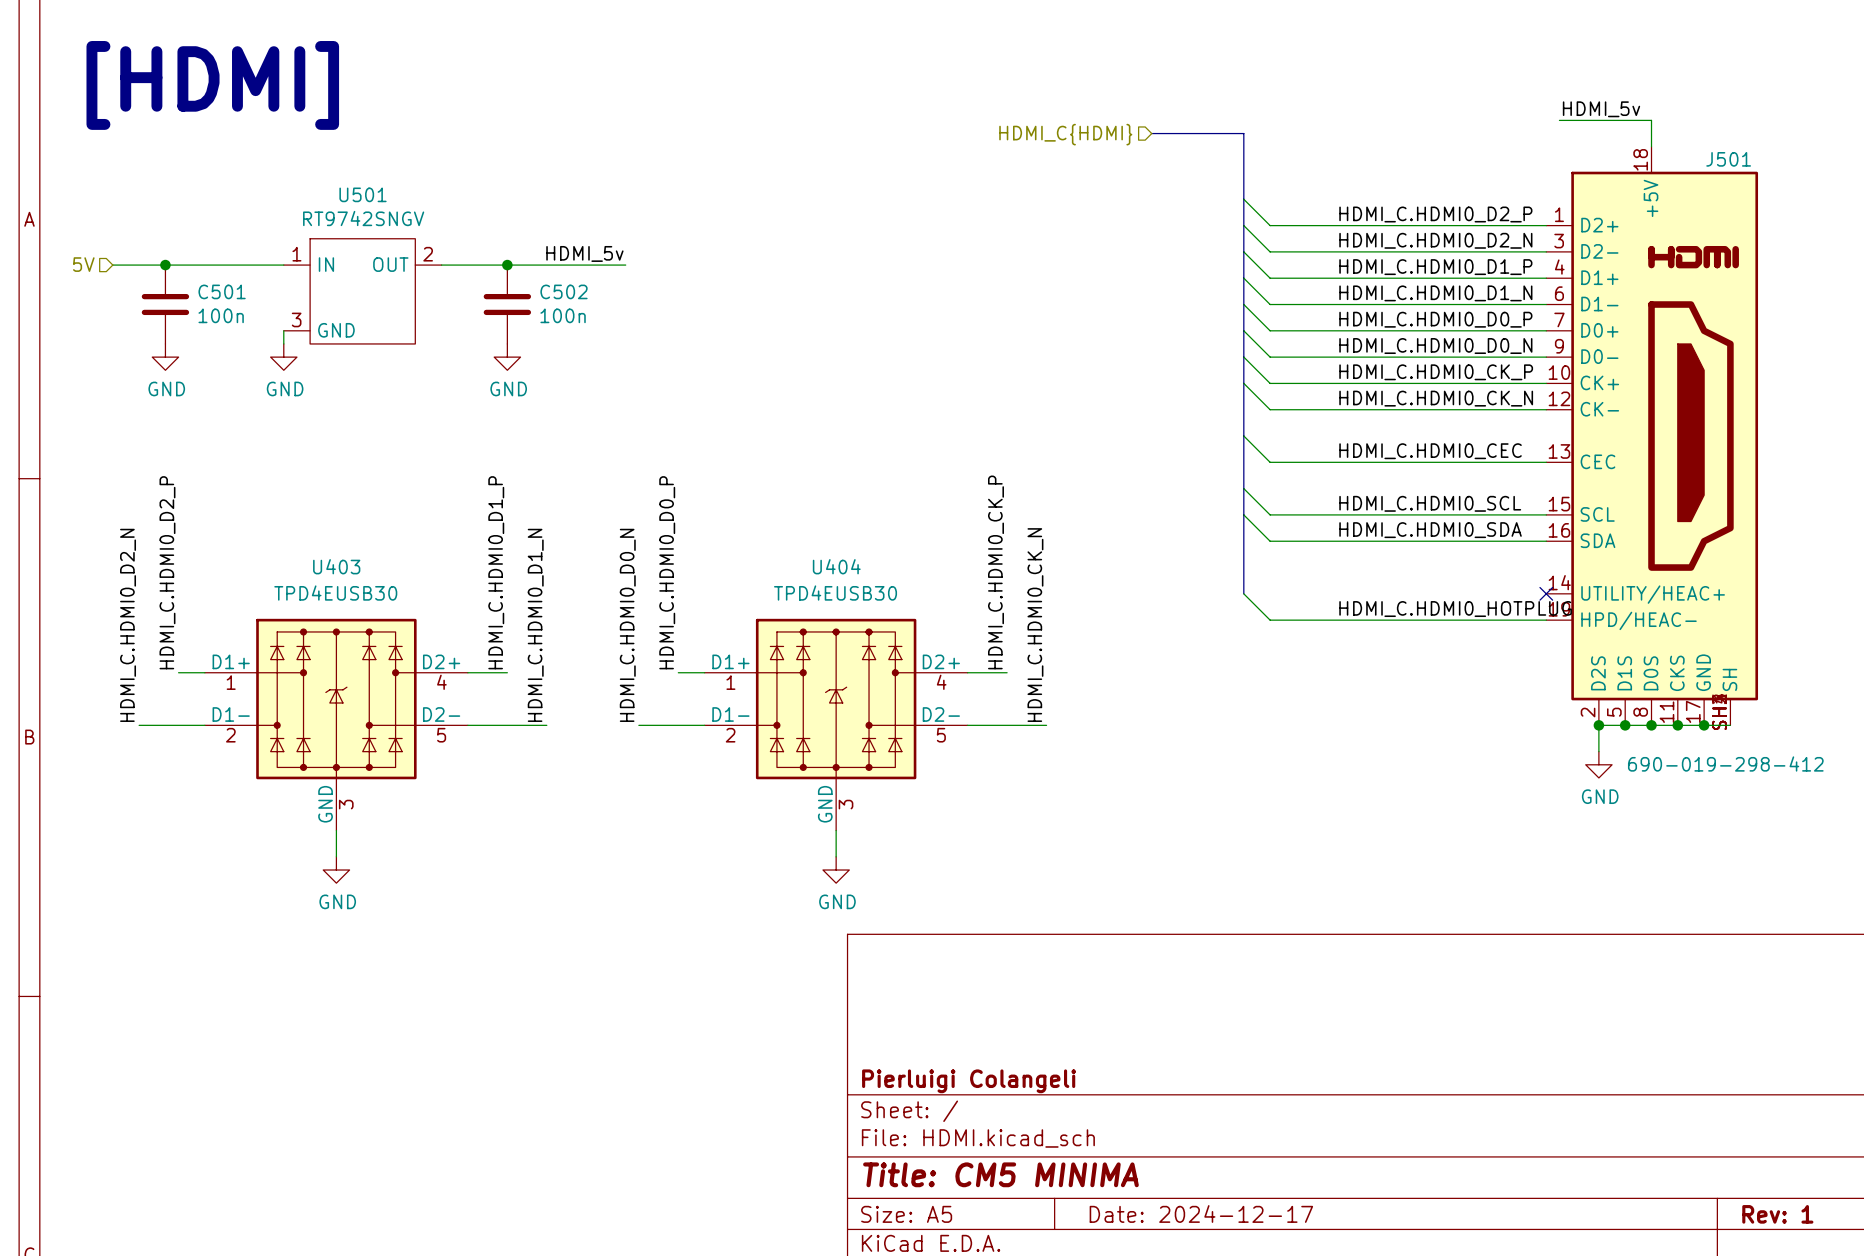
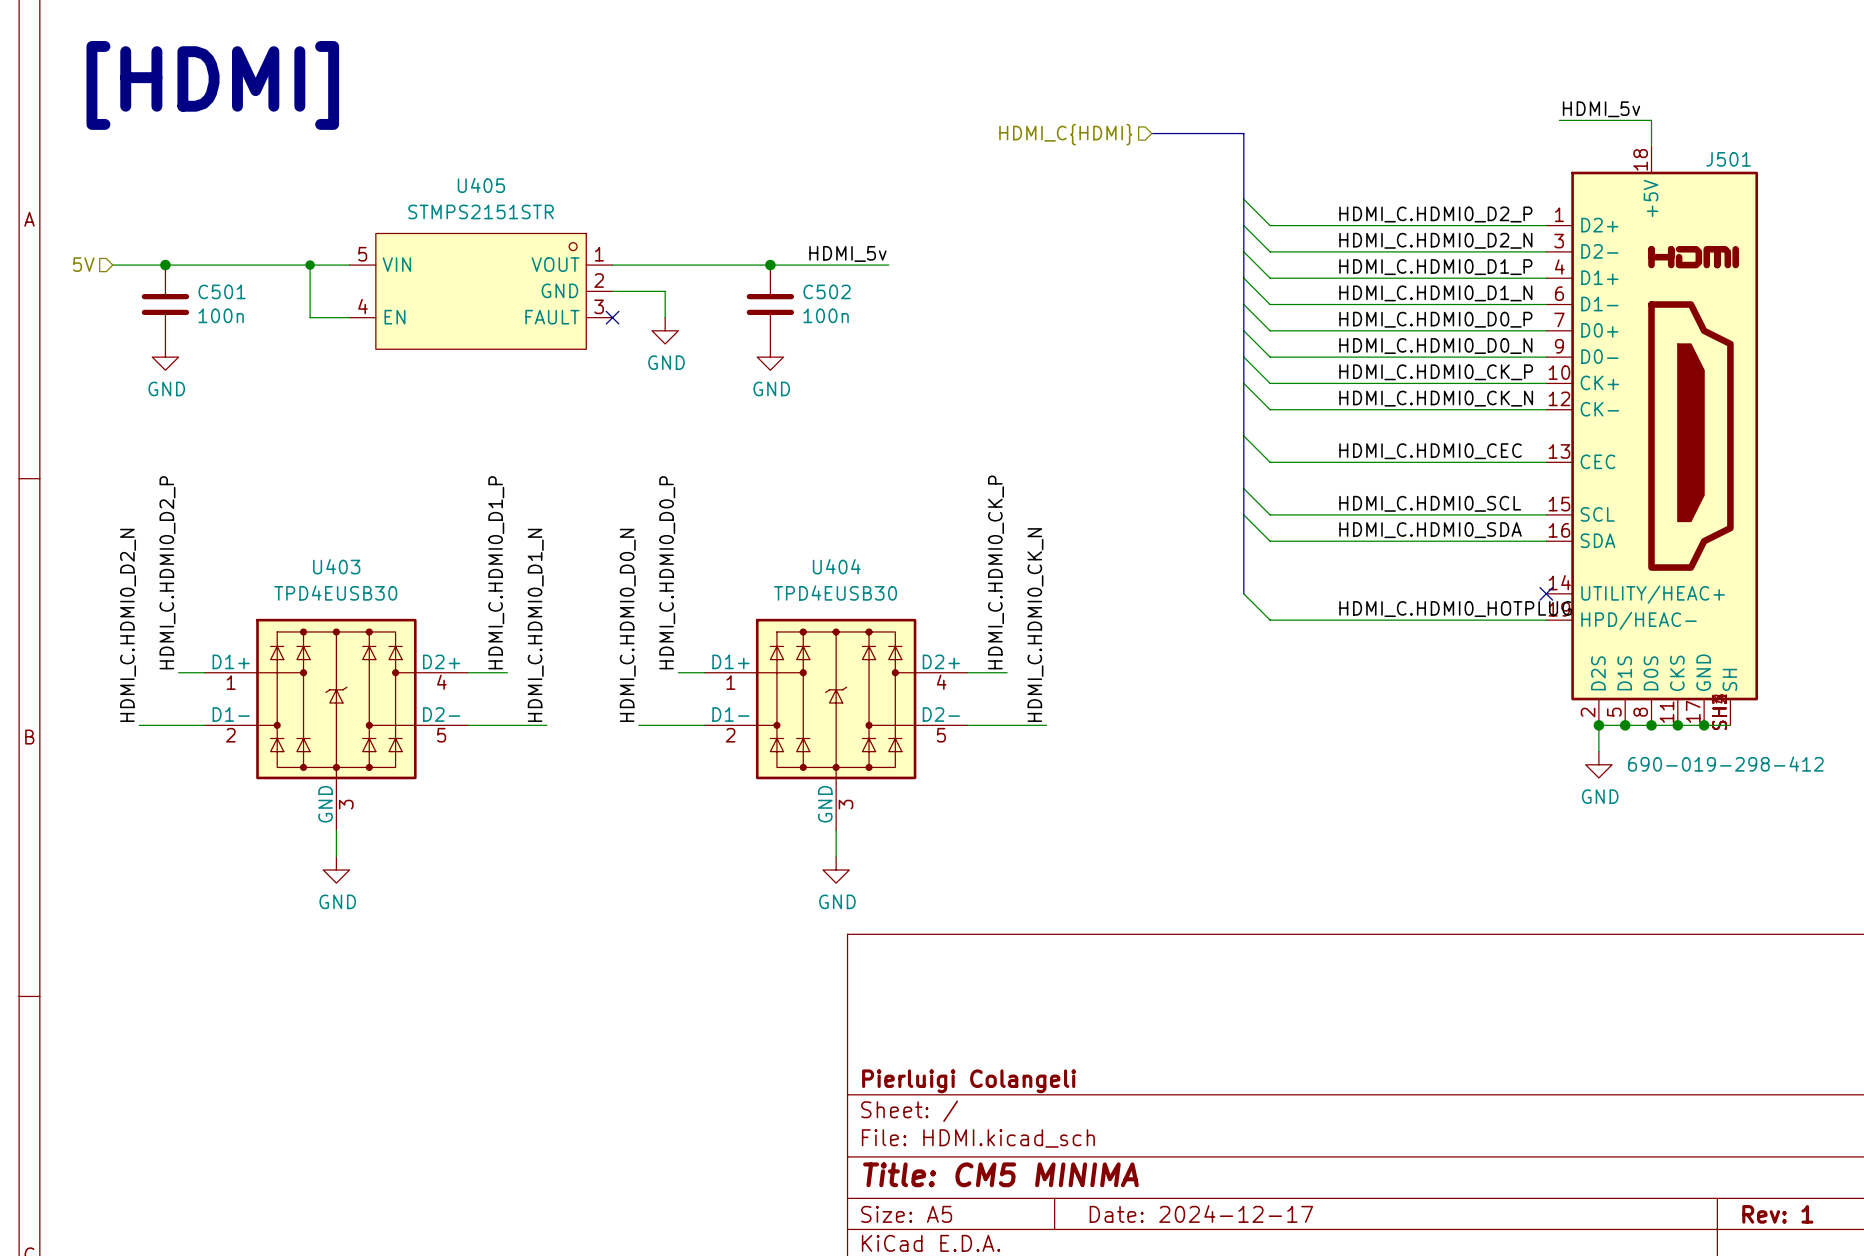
label: HDMI_5v (584, 253) -> none
label: none -> HDMI_5v (847, 253)
wire: none -> (283, 265) (349, 265)
wire: none -> (310, 265) (310, 317) (349, 317)
junction: none -> (310, 265)
junction: (507, 265) -> none
wire: none -> (625, 265) (888, 265)
junction: none -> (770, 265)
U501: RT9742SNGV (362, 291) -> none
U405: none -> STMPS2151STR (481, 291)
wire: none -> (612, 291) (665, 291) (665, 317)
C502 position: (507, 304) -> (770, 304)
no-connect mark: none -> (612, 317)
wire: (283, 330) (283, 343) -> none
power symbol: none -> GND (665, 330)
power symbol: GND (283, 357) -> none
power symbol: GND (507, 357) -> none
power symbol: none -> GND (770, 357)

